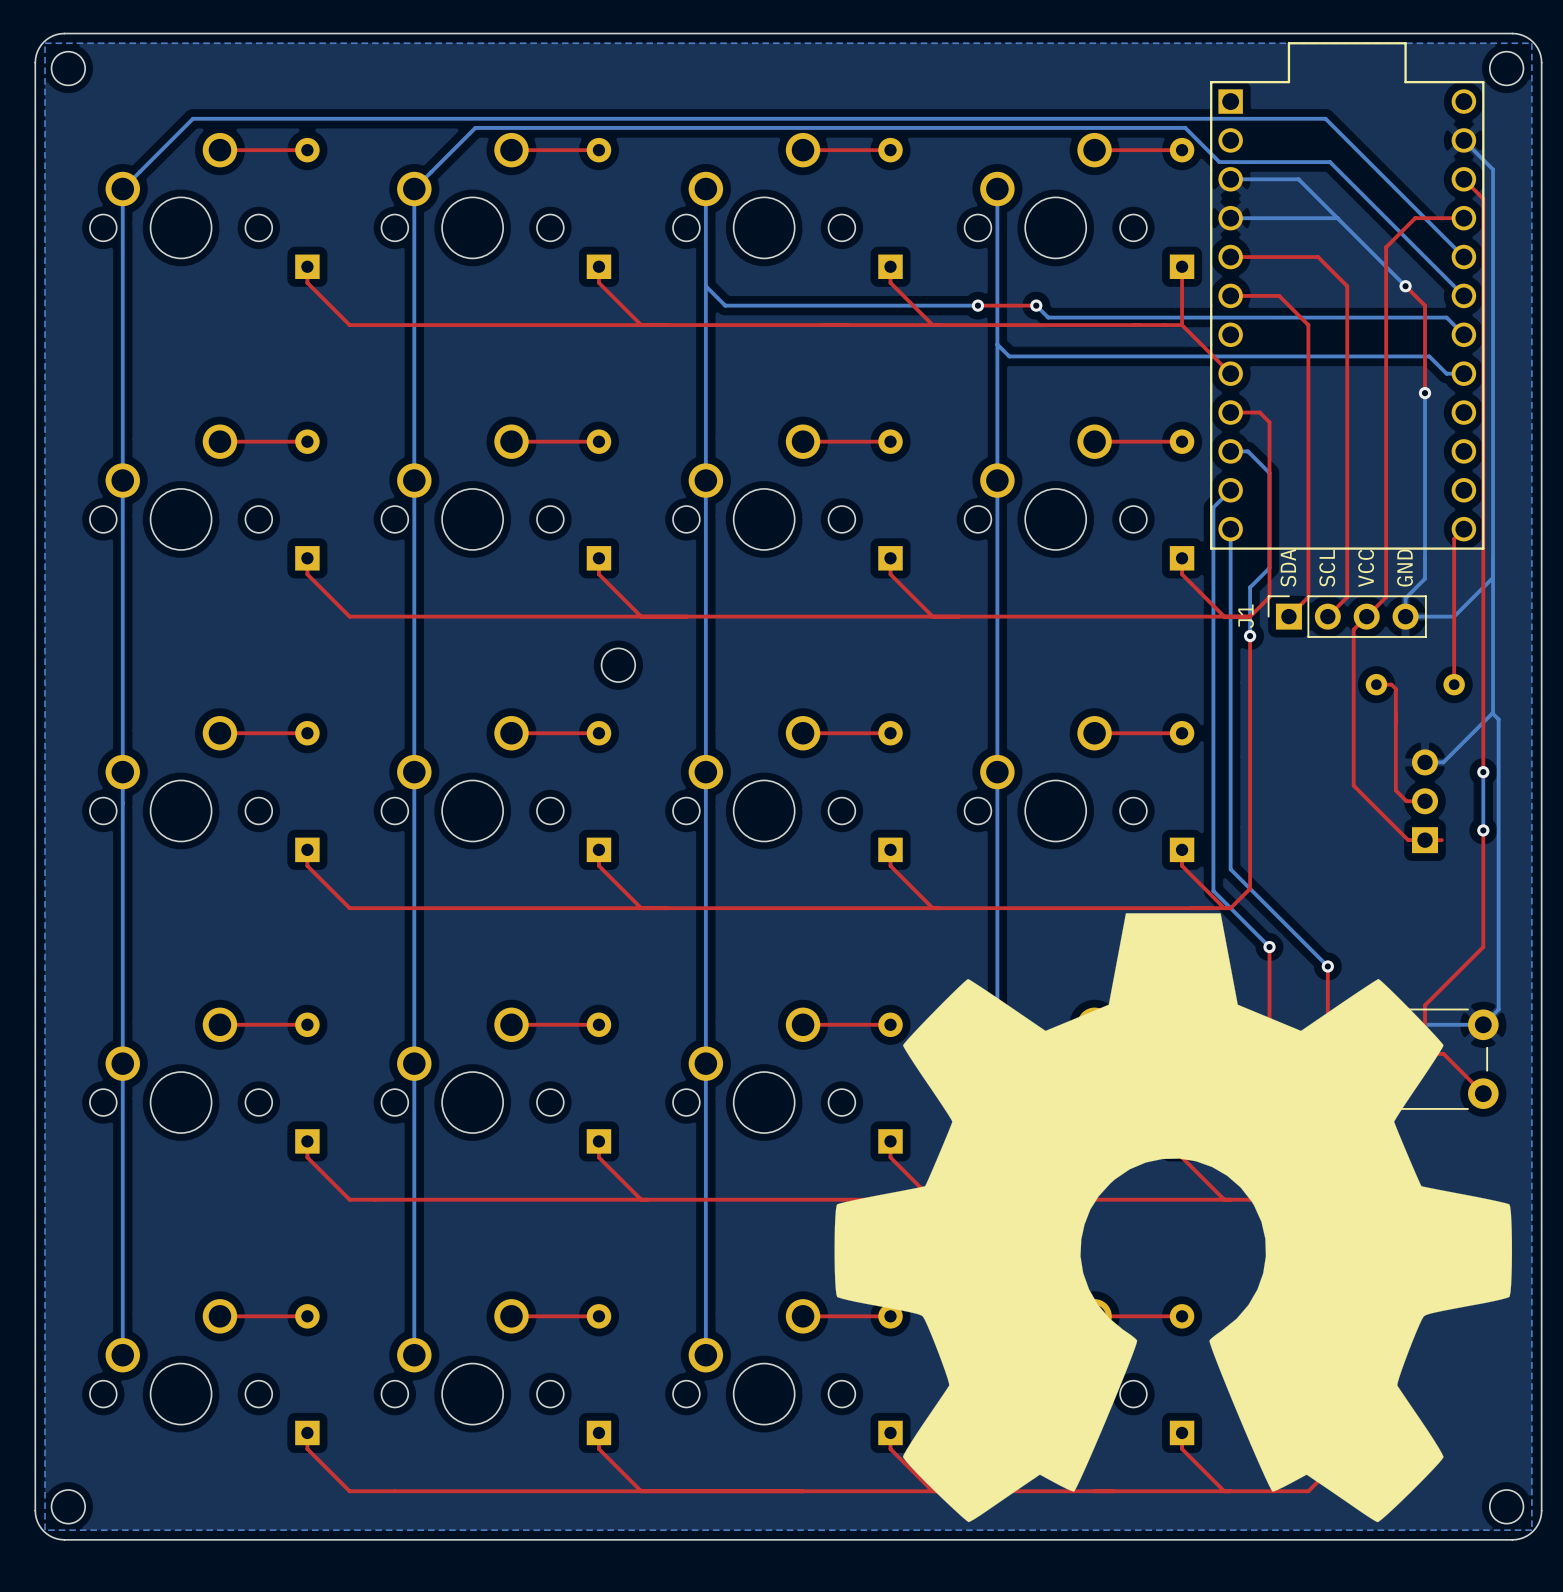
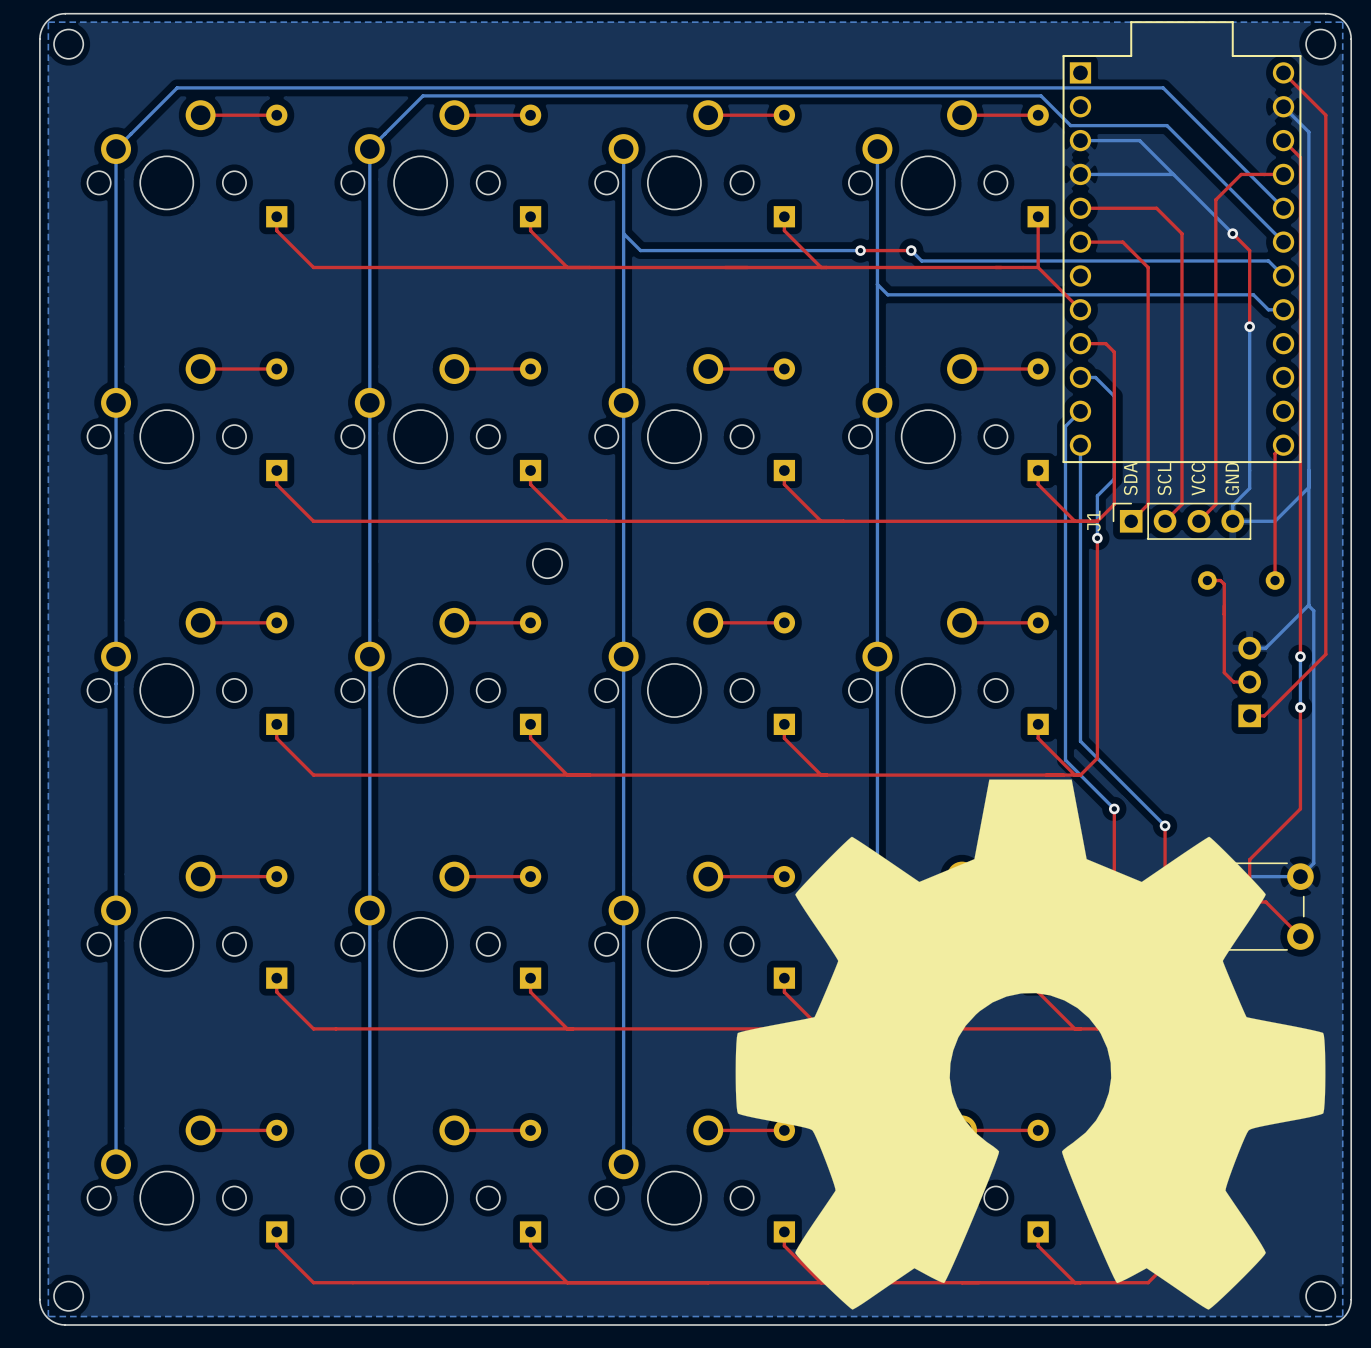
top track: none -> (1283, 72) (1325, 115) (1325, 654) (1264, 715)
top track: (1366, 616) (1353, 629) (1353, 785) (1408, 840) (1425, 840) -> none

